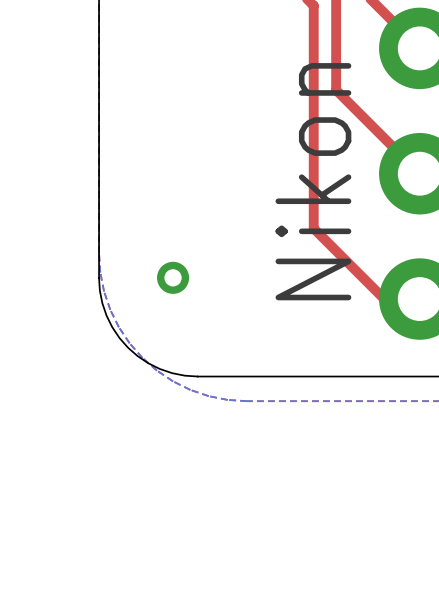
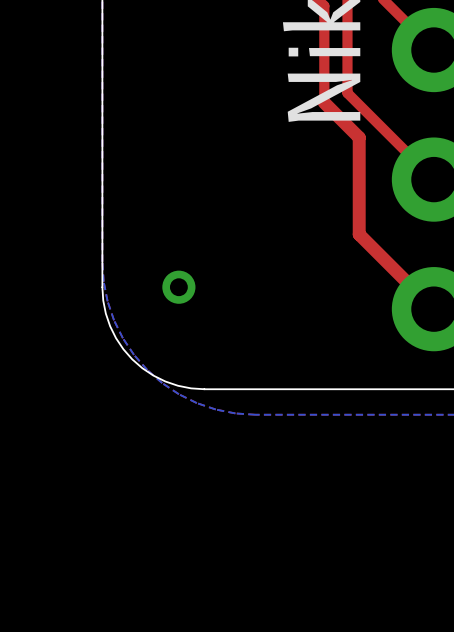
top track: (313, 99) (313, 228) (384, 299) (419, 299) -> (324, 102) (359, 137) (359, 234) (433, 309)

